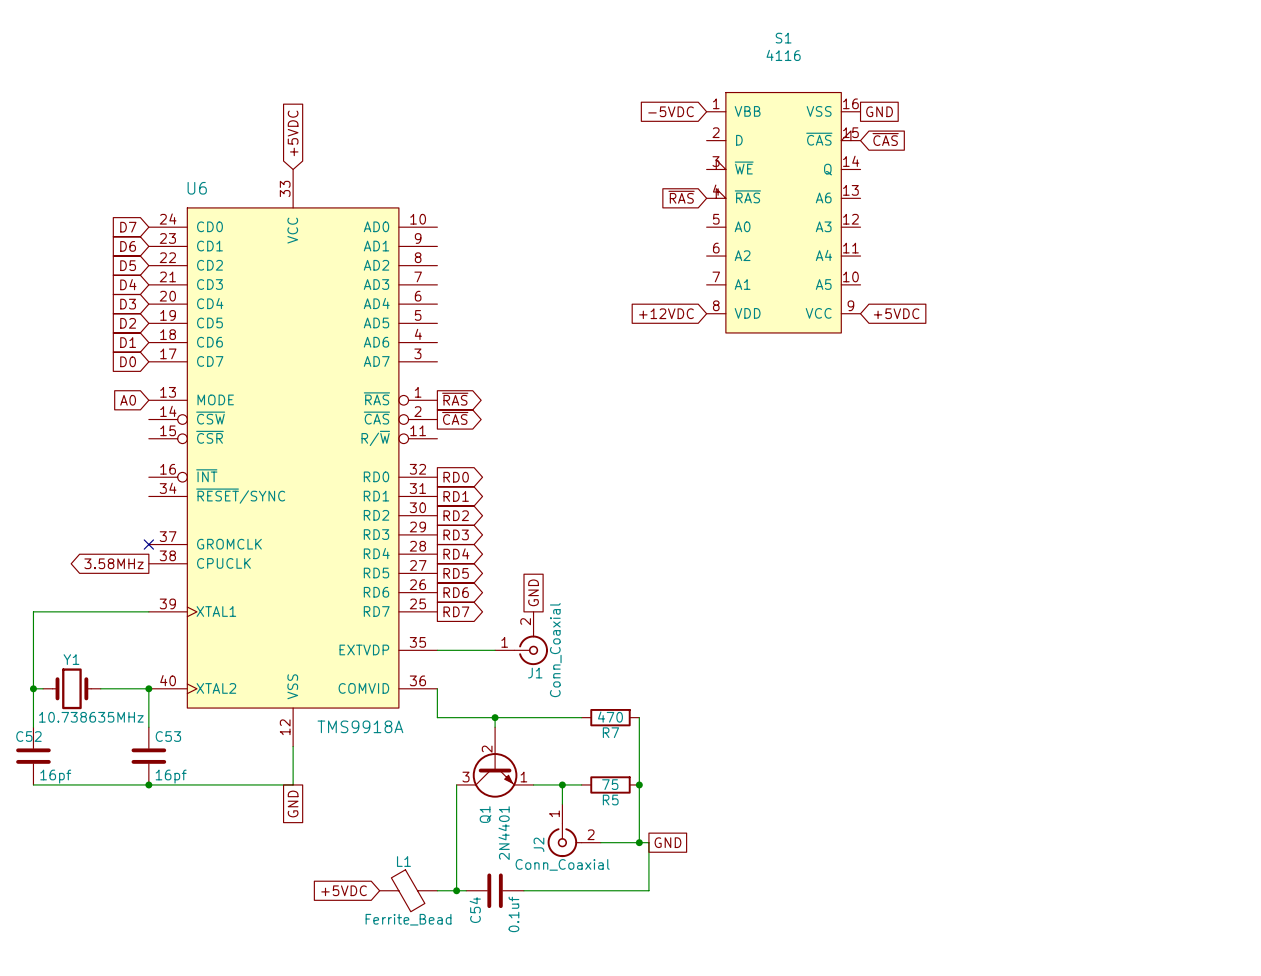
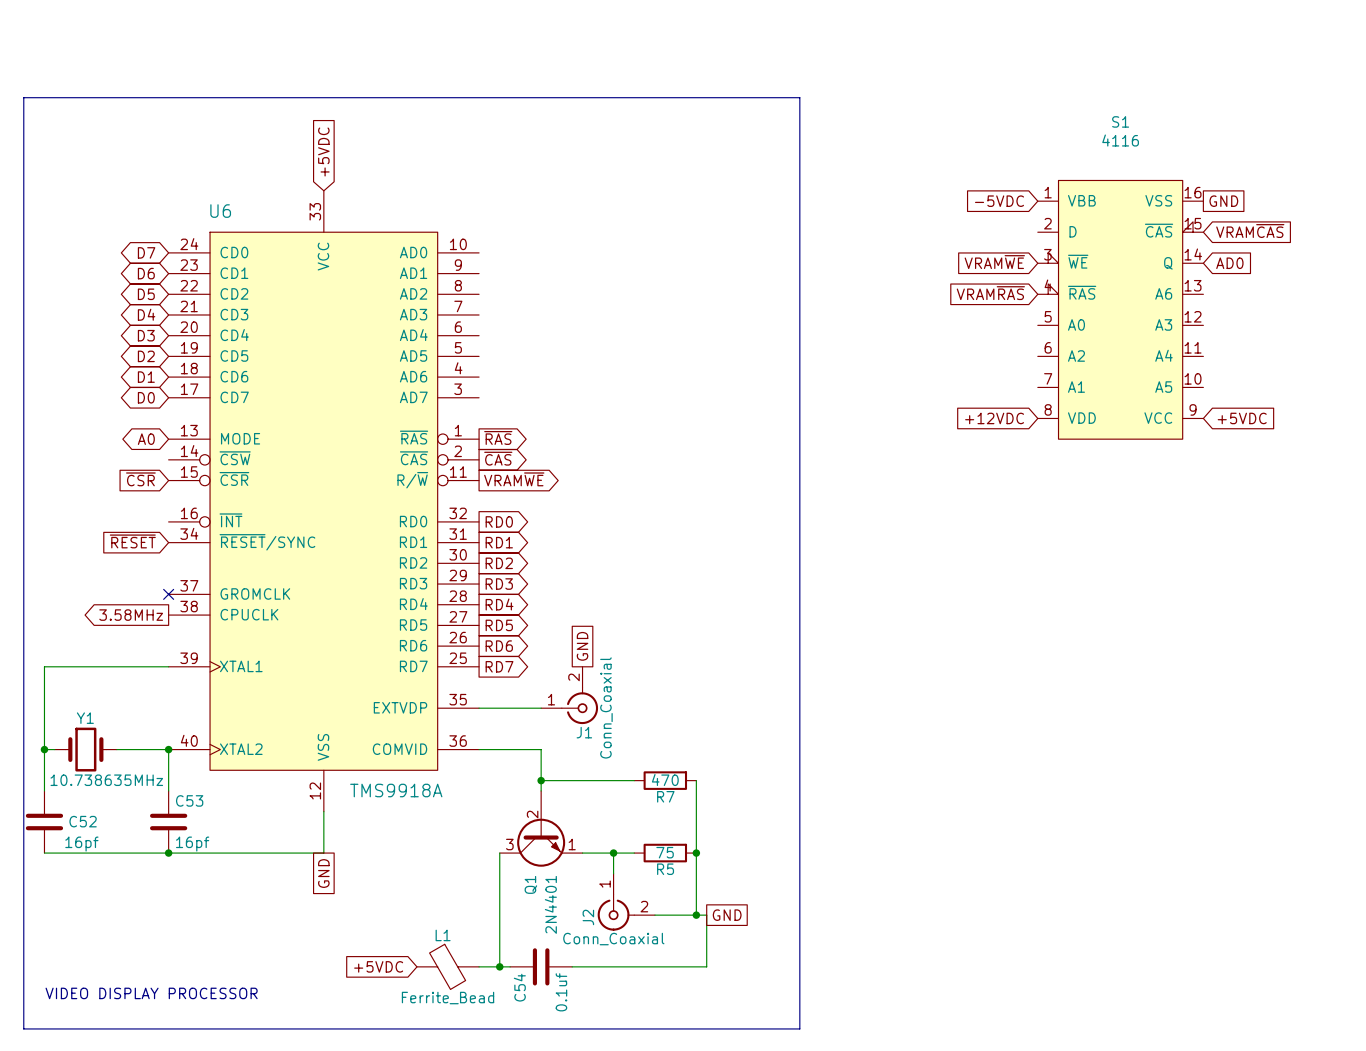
line: none -> (23, 97) (799, 97) (799, 1028) (23, 1028) (23, 97)
global label: -5VDC (671, 111) -> none
global label: GND (879, 111) -> none
global label: ~{CAS} (885, 139) -> none
global label: none -> -5VDC (999, 201)
global label: none -> GND (1223, 201)
global label: ~{RAS} (681, 197) -> none
global label: none -> VRAM~{CAS} (1250, 231)
S1 position: (783, 212) -> (1120, 309)
global label shape: input (128, 227) -> bidirectional (146, 252)
global label: none -> VRAM~{WE} (994, 262)
global label: none -> AD0 (1229, 263)
global label shape: input (128, 246) -> bidirectional (146, 273)
global label: none -> VRAM~{RAS} (990, 293)
global label shape: input (128, 265) -> bidirectional (146, 294)
global label shape: input (128, 284) -> bidirectional (146, 314)
global label shape: input (128, 304) -> bidirectional (146, 335)
global label: +12VDC (666, 313) -> none
global label: +5VDC (896, 313) -> none
global label shape: input (128, 323) -> bidirectional (146, 356)
global label shape: input (128, 342) -> bidirectional (146, 377)
global label shape: input (128, 361) -> bidirectional (146, 397)
global label: none -> +12VDC (994, 418)
global label: none -> +5VDC (1242, 418)
global label shape: input (128, 400) -> bidirectional (146, 439)
global label: none -> ~{CSR} (140, 479)
global label: none -> VRAM~{WE} (514, 479)
global label: none -> ~{RESET} (132, 541)
wire: (437, 688) (437, 717) (495, 717) -> (479, 749) (541, 749) (541, 780)
C52 name position: C52 (28, 736) -> C52 (83, 821)
C52 value position: 16pf (55, 776) -> 16pf (81, 844)
text: none -> VIDEO DISPLAY PROCESSOR (151, 993)

